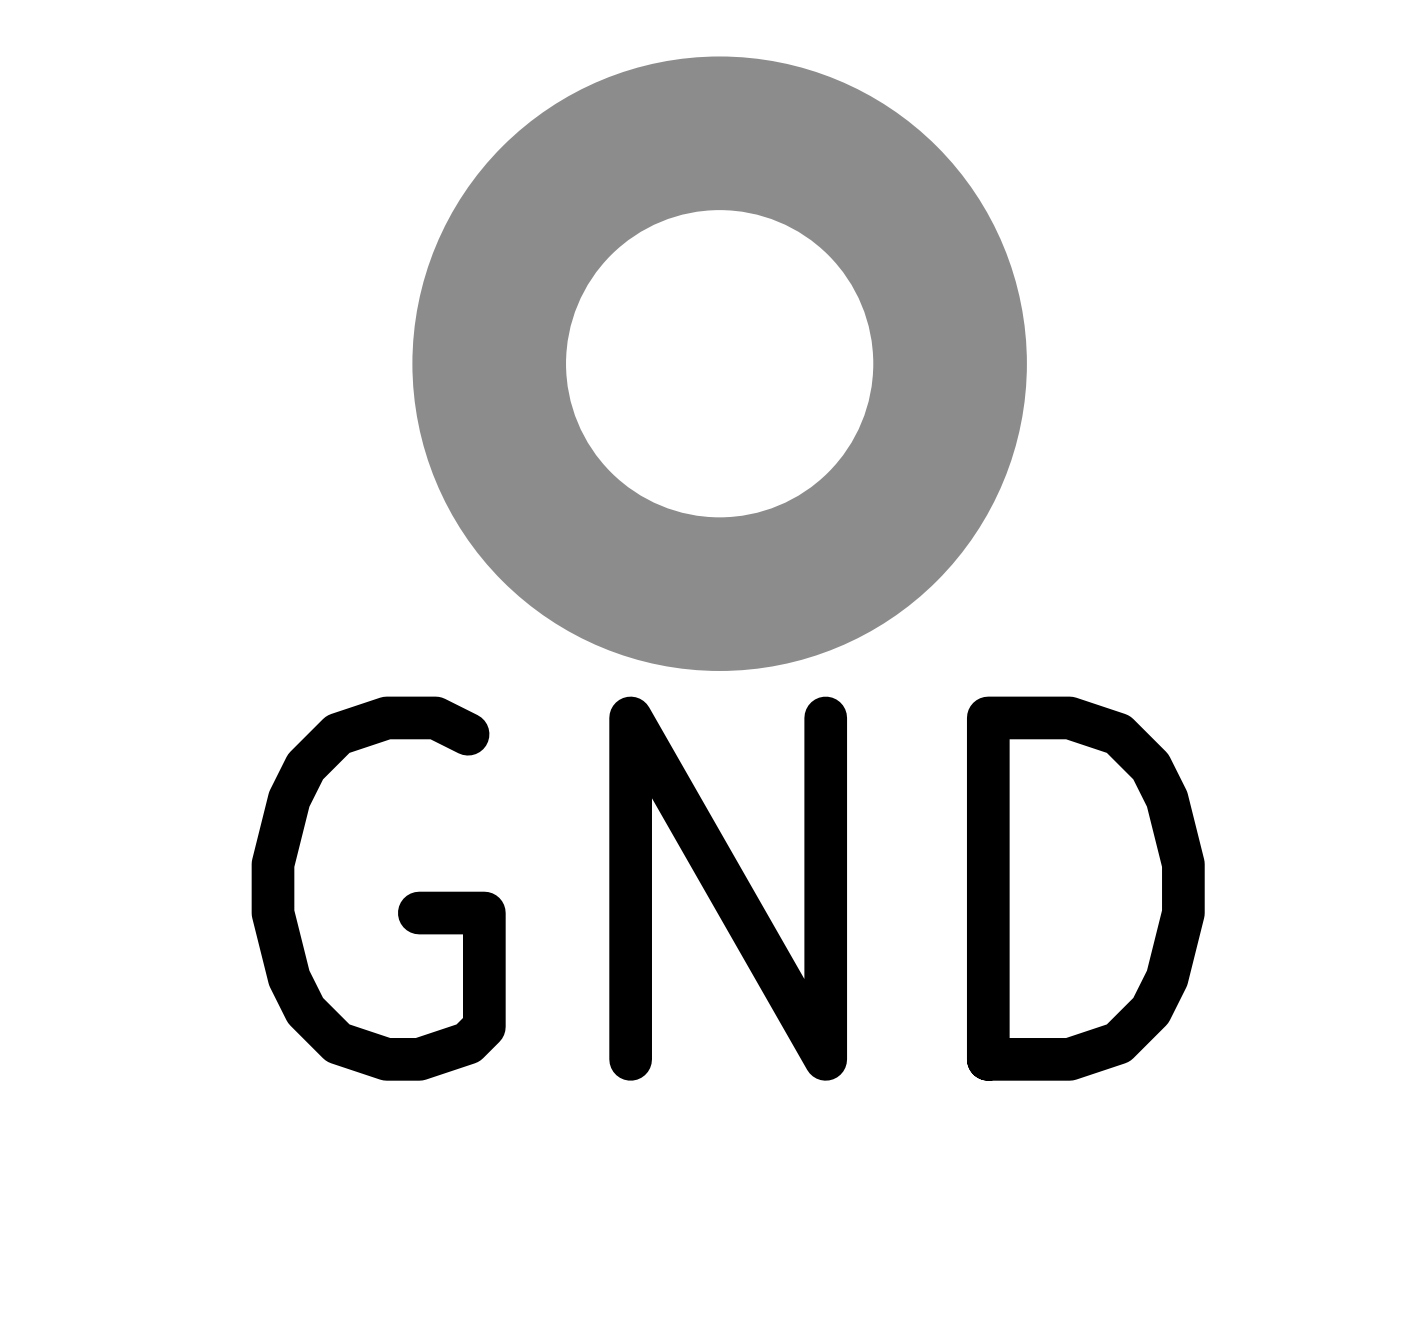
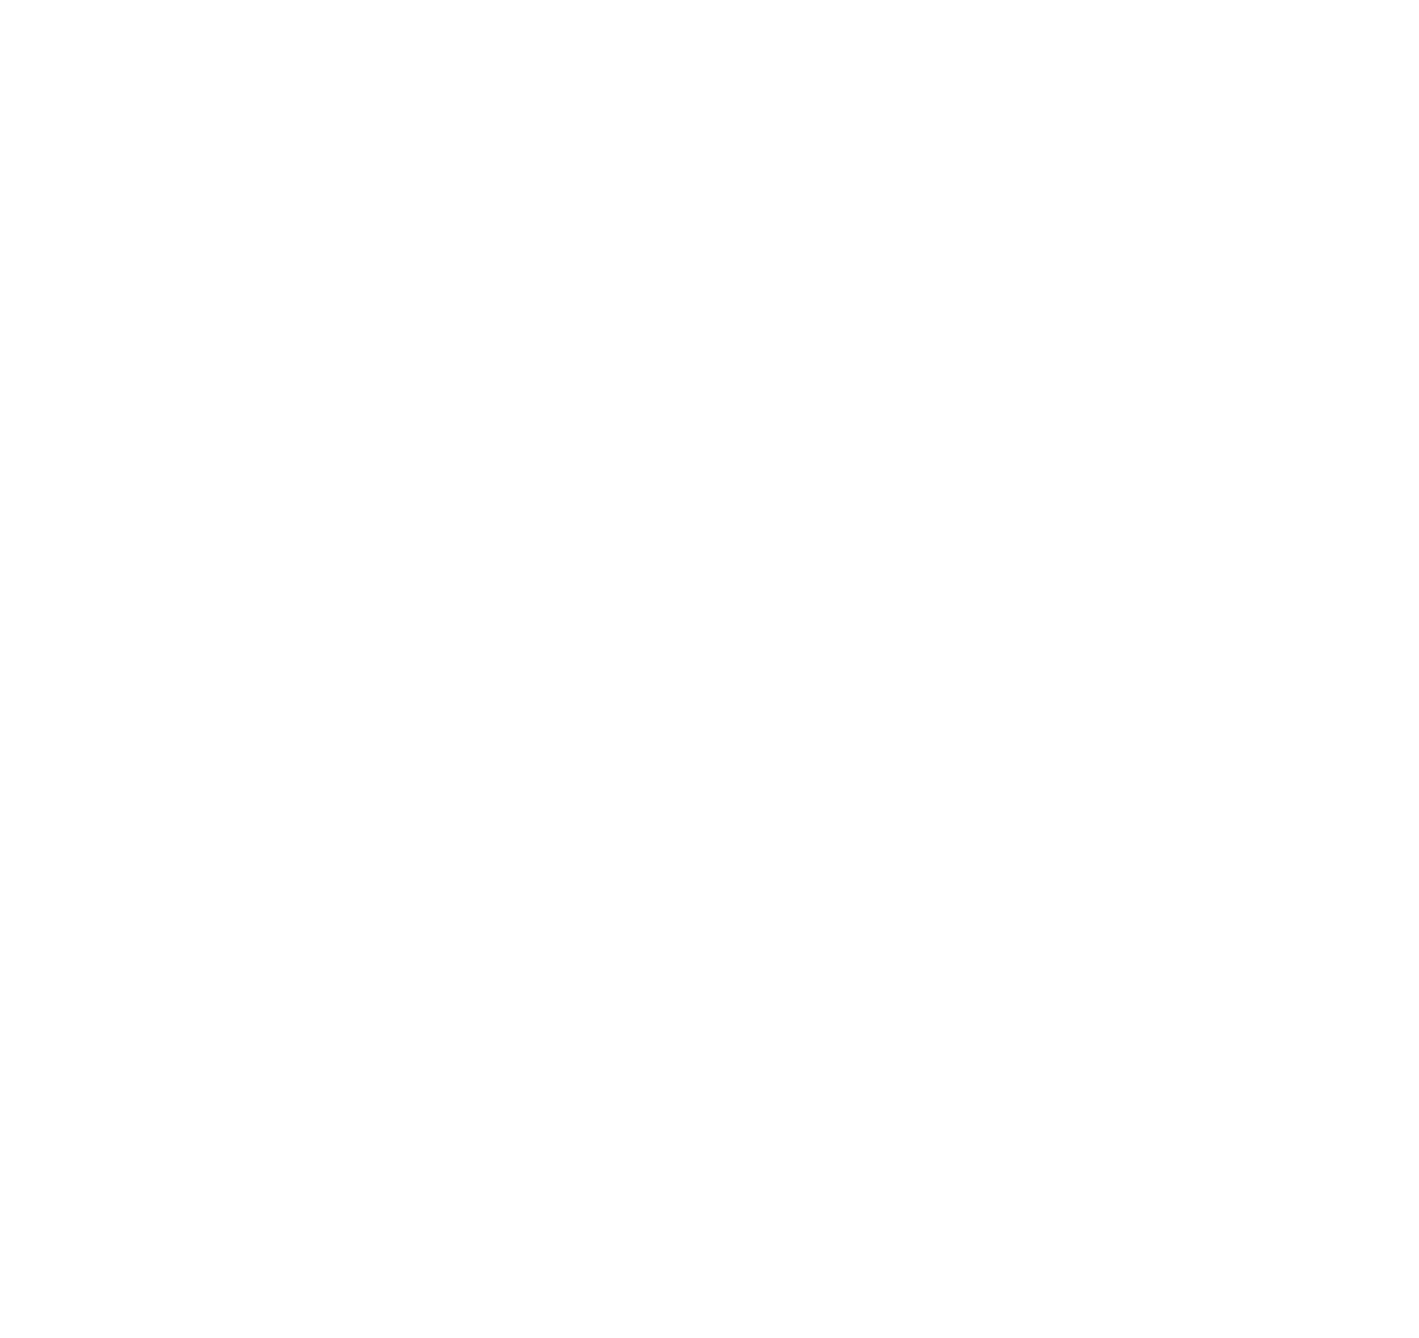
part: (719, 363) -> none
text: GND (728, 888) -> none

